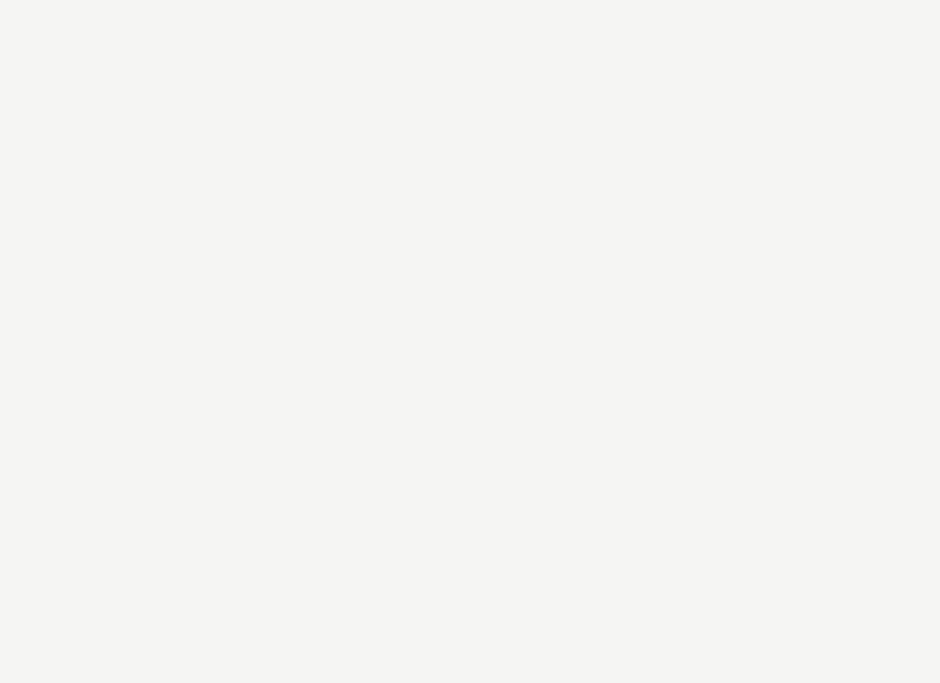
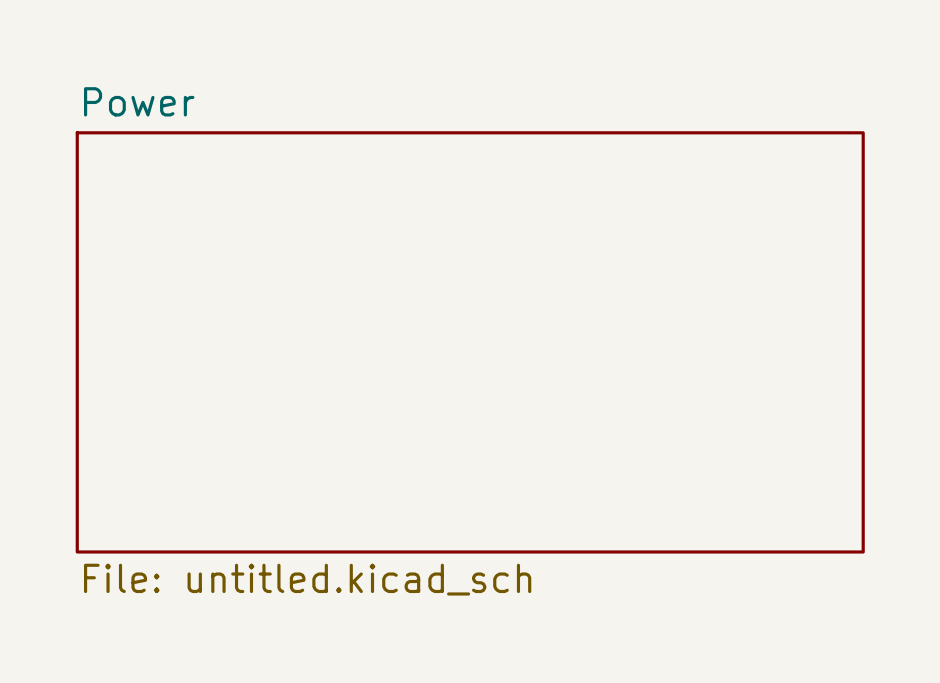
sheet Power: none -> File: untitled.kicad_sch (470, 342)

